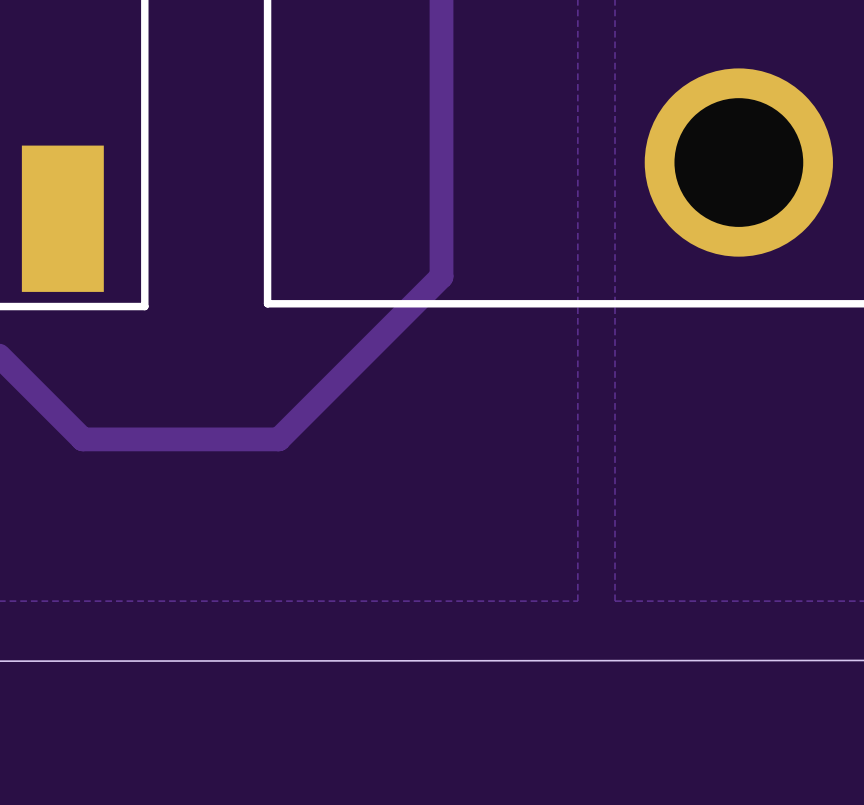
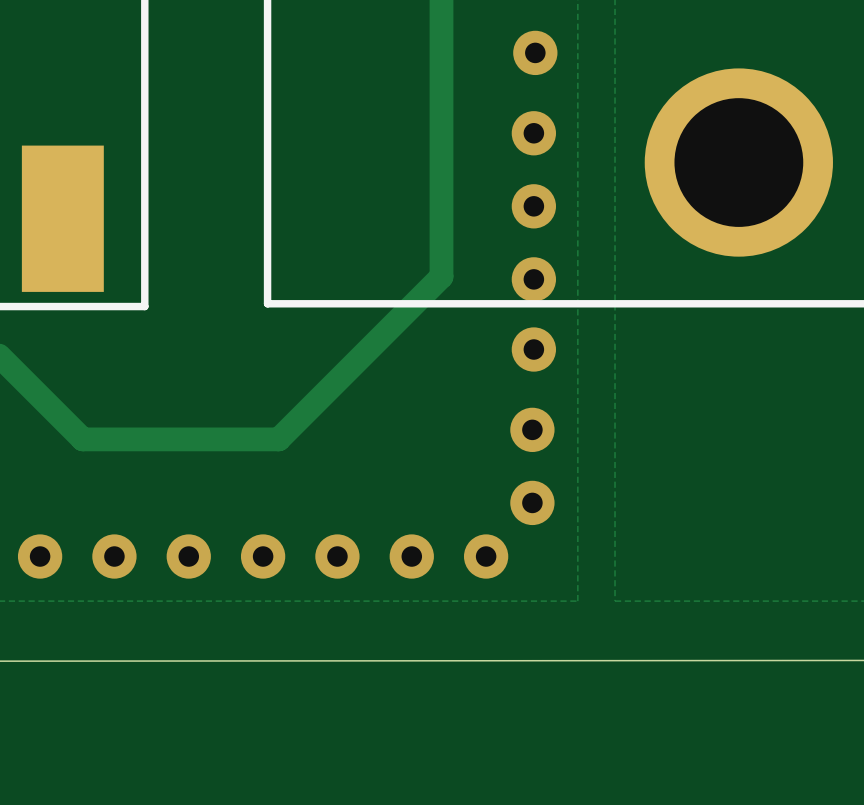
via: none -> (535, 52)
via: none -> (533, 133)
via: none -> (533, 206)
via: none -> (533, 279)
via: none -> (533, 349)
via: none -> (532, 429)
via: none -> (532, 502)
via: none -> (40, 556)
via: none -> (114, 556)
via: none -> (188, 556)
via: none -> (263, 556)
via: none -> (337, 556)
via: none -> (411, 556)
via: none -> (486, 556)

